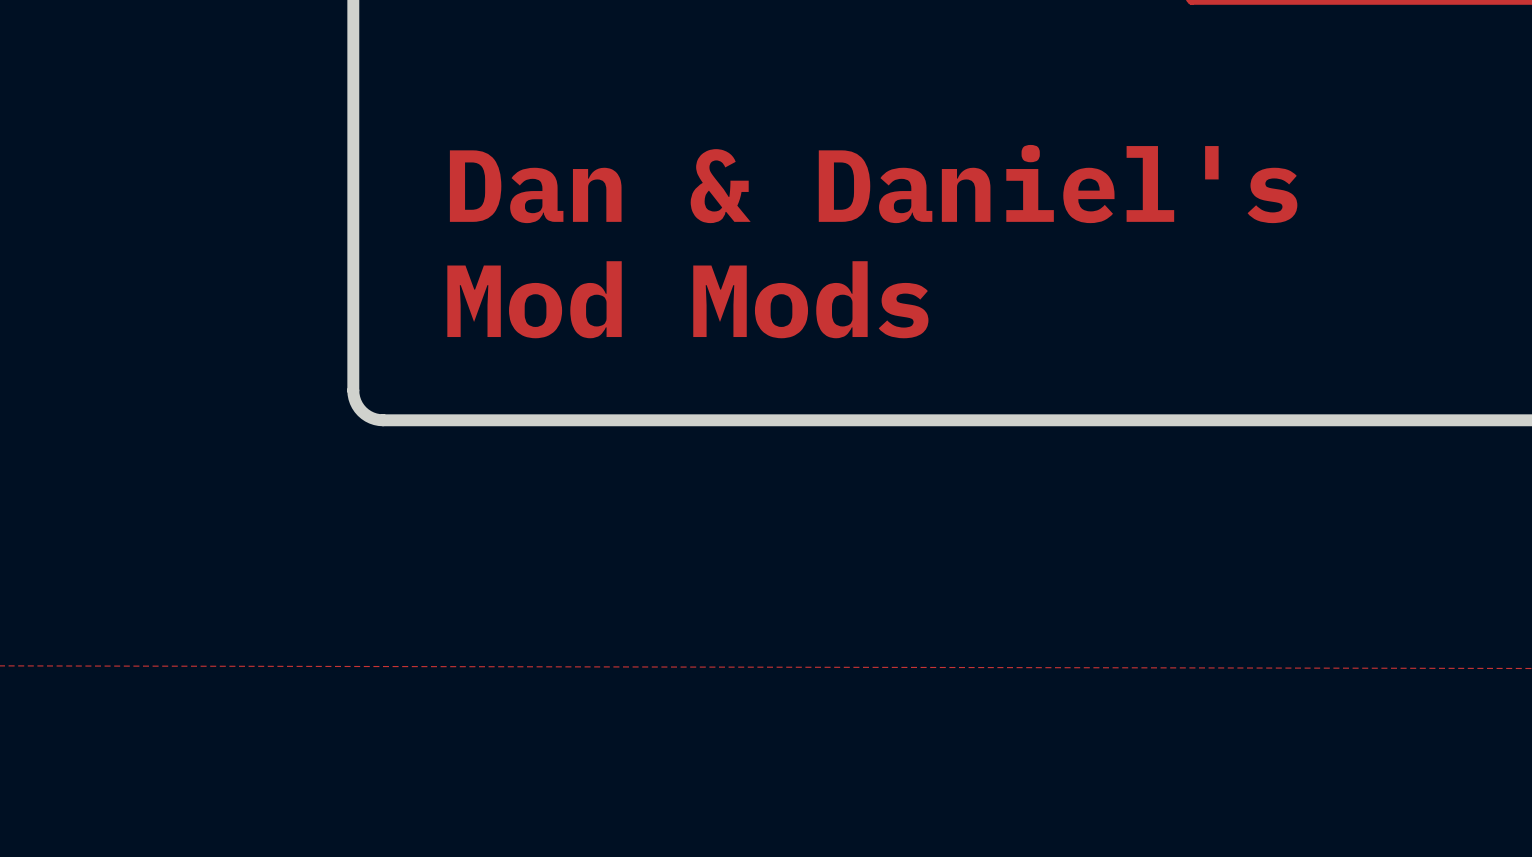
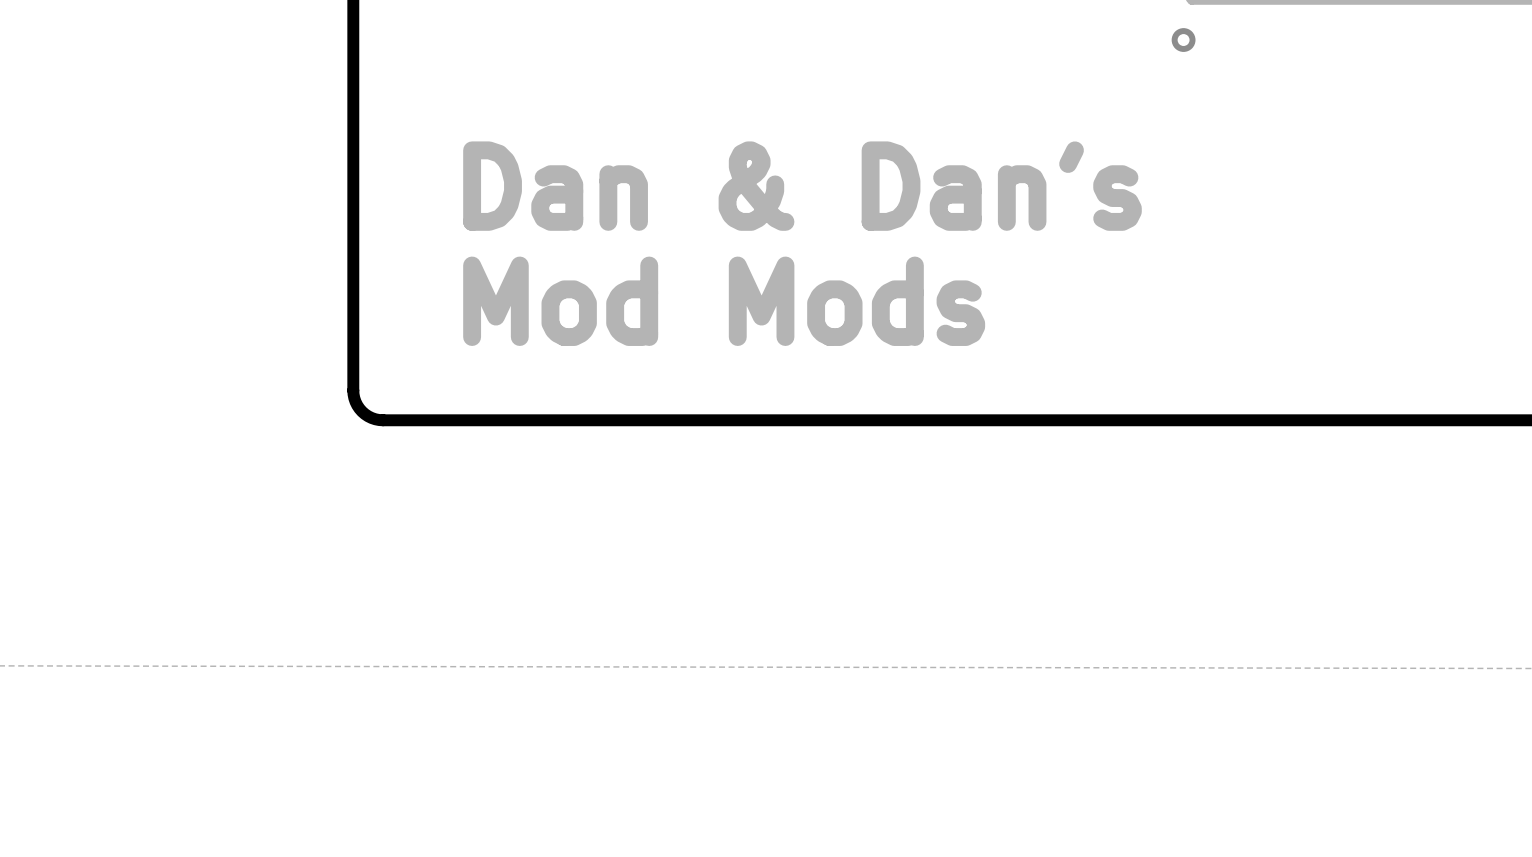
via: none -> (1183, 40)
text: Dan & Daniel's (873, 184) -> Dan & Dan's (802, 186)

